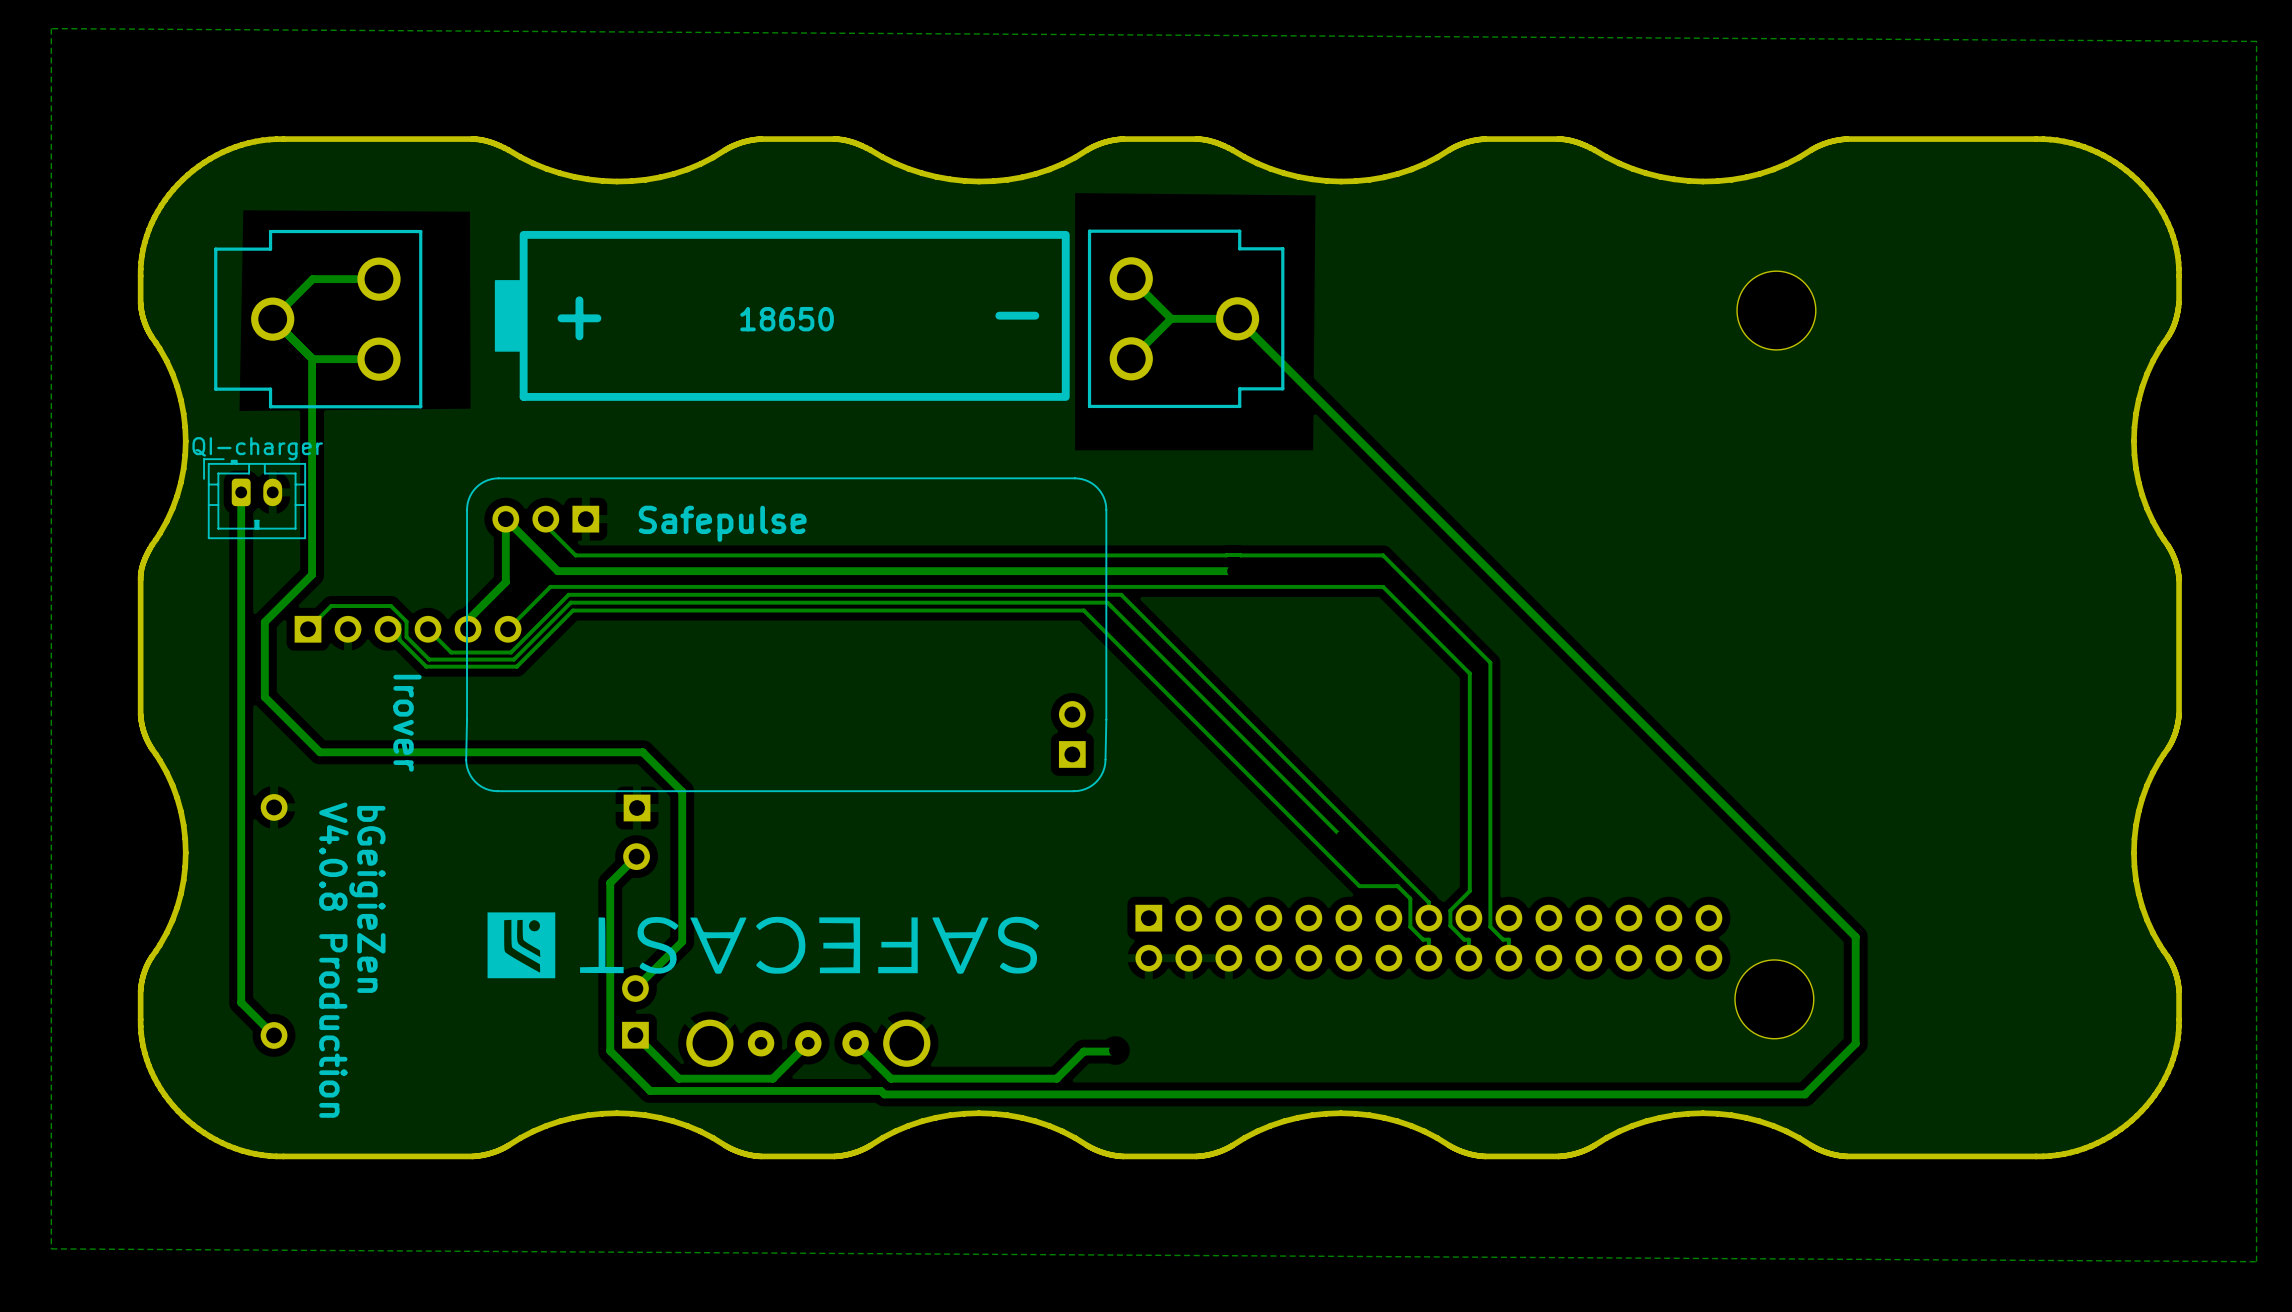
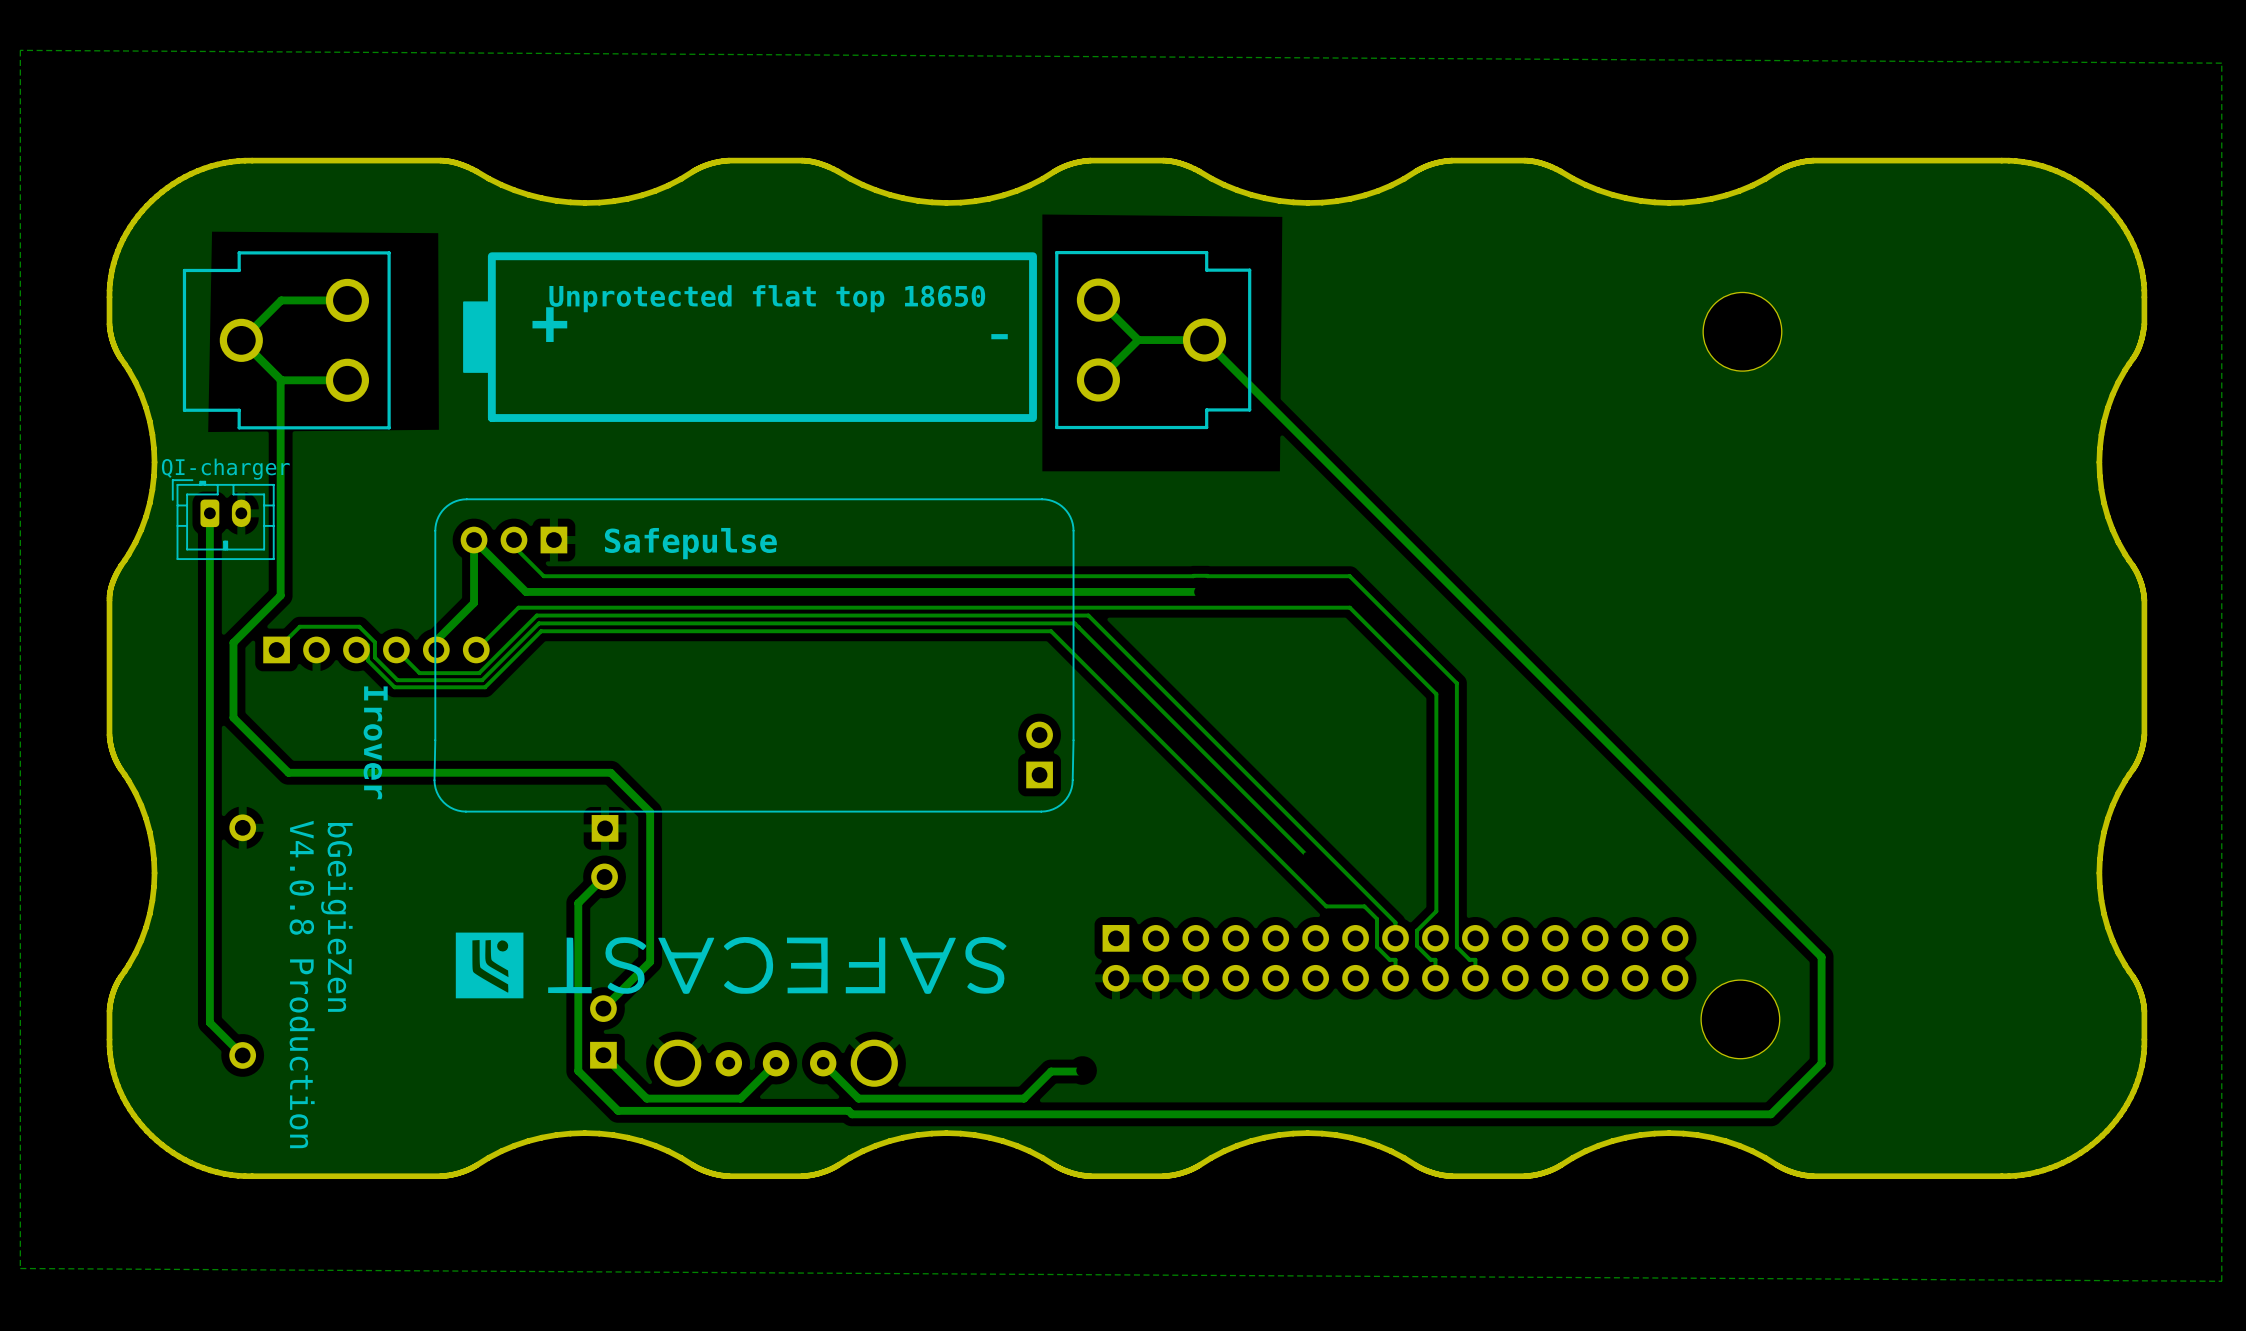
drawing shape: [494, 230, 1070, 401] -> [463, 252, 1037, 422]

